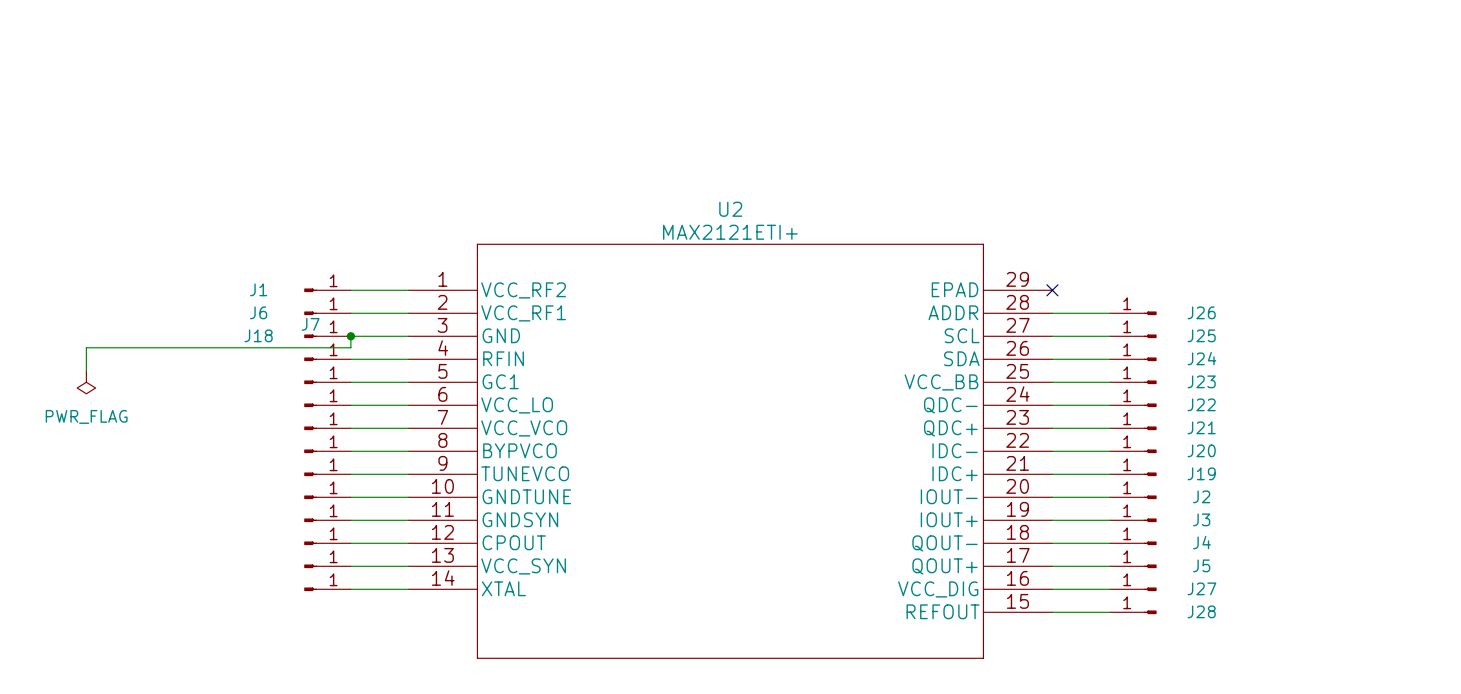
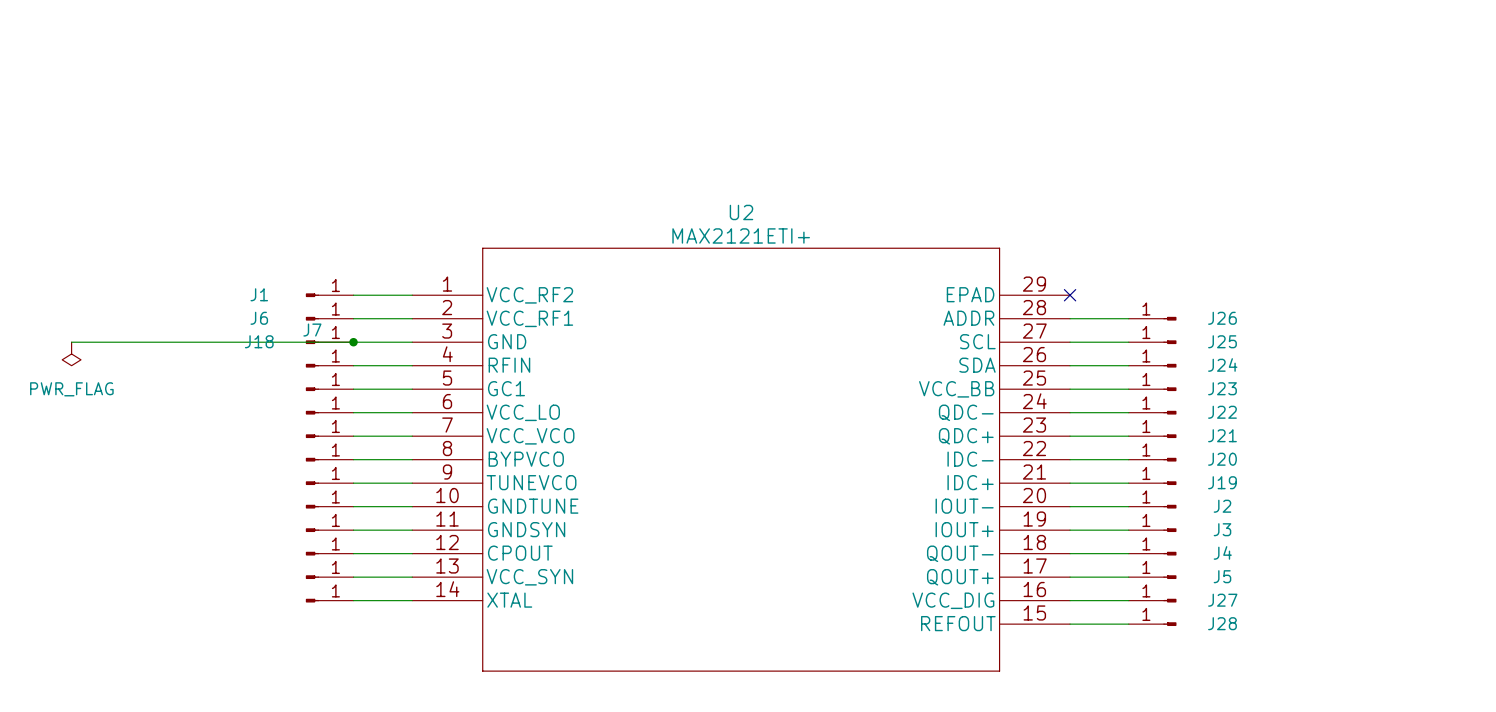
wire: (350, 336) (350, 347) (86, 347) (86, 370) -> (353, 342) (71, 342)
power symbol position: PWR_FLAG (86, 382) -> PWR_FLAG (71, 353)

